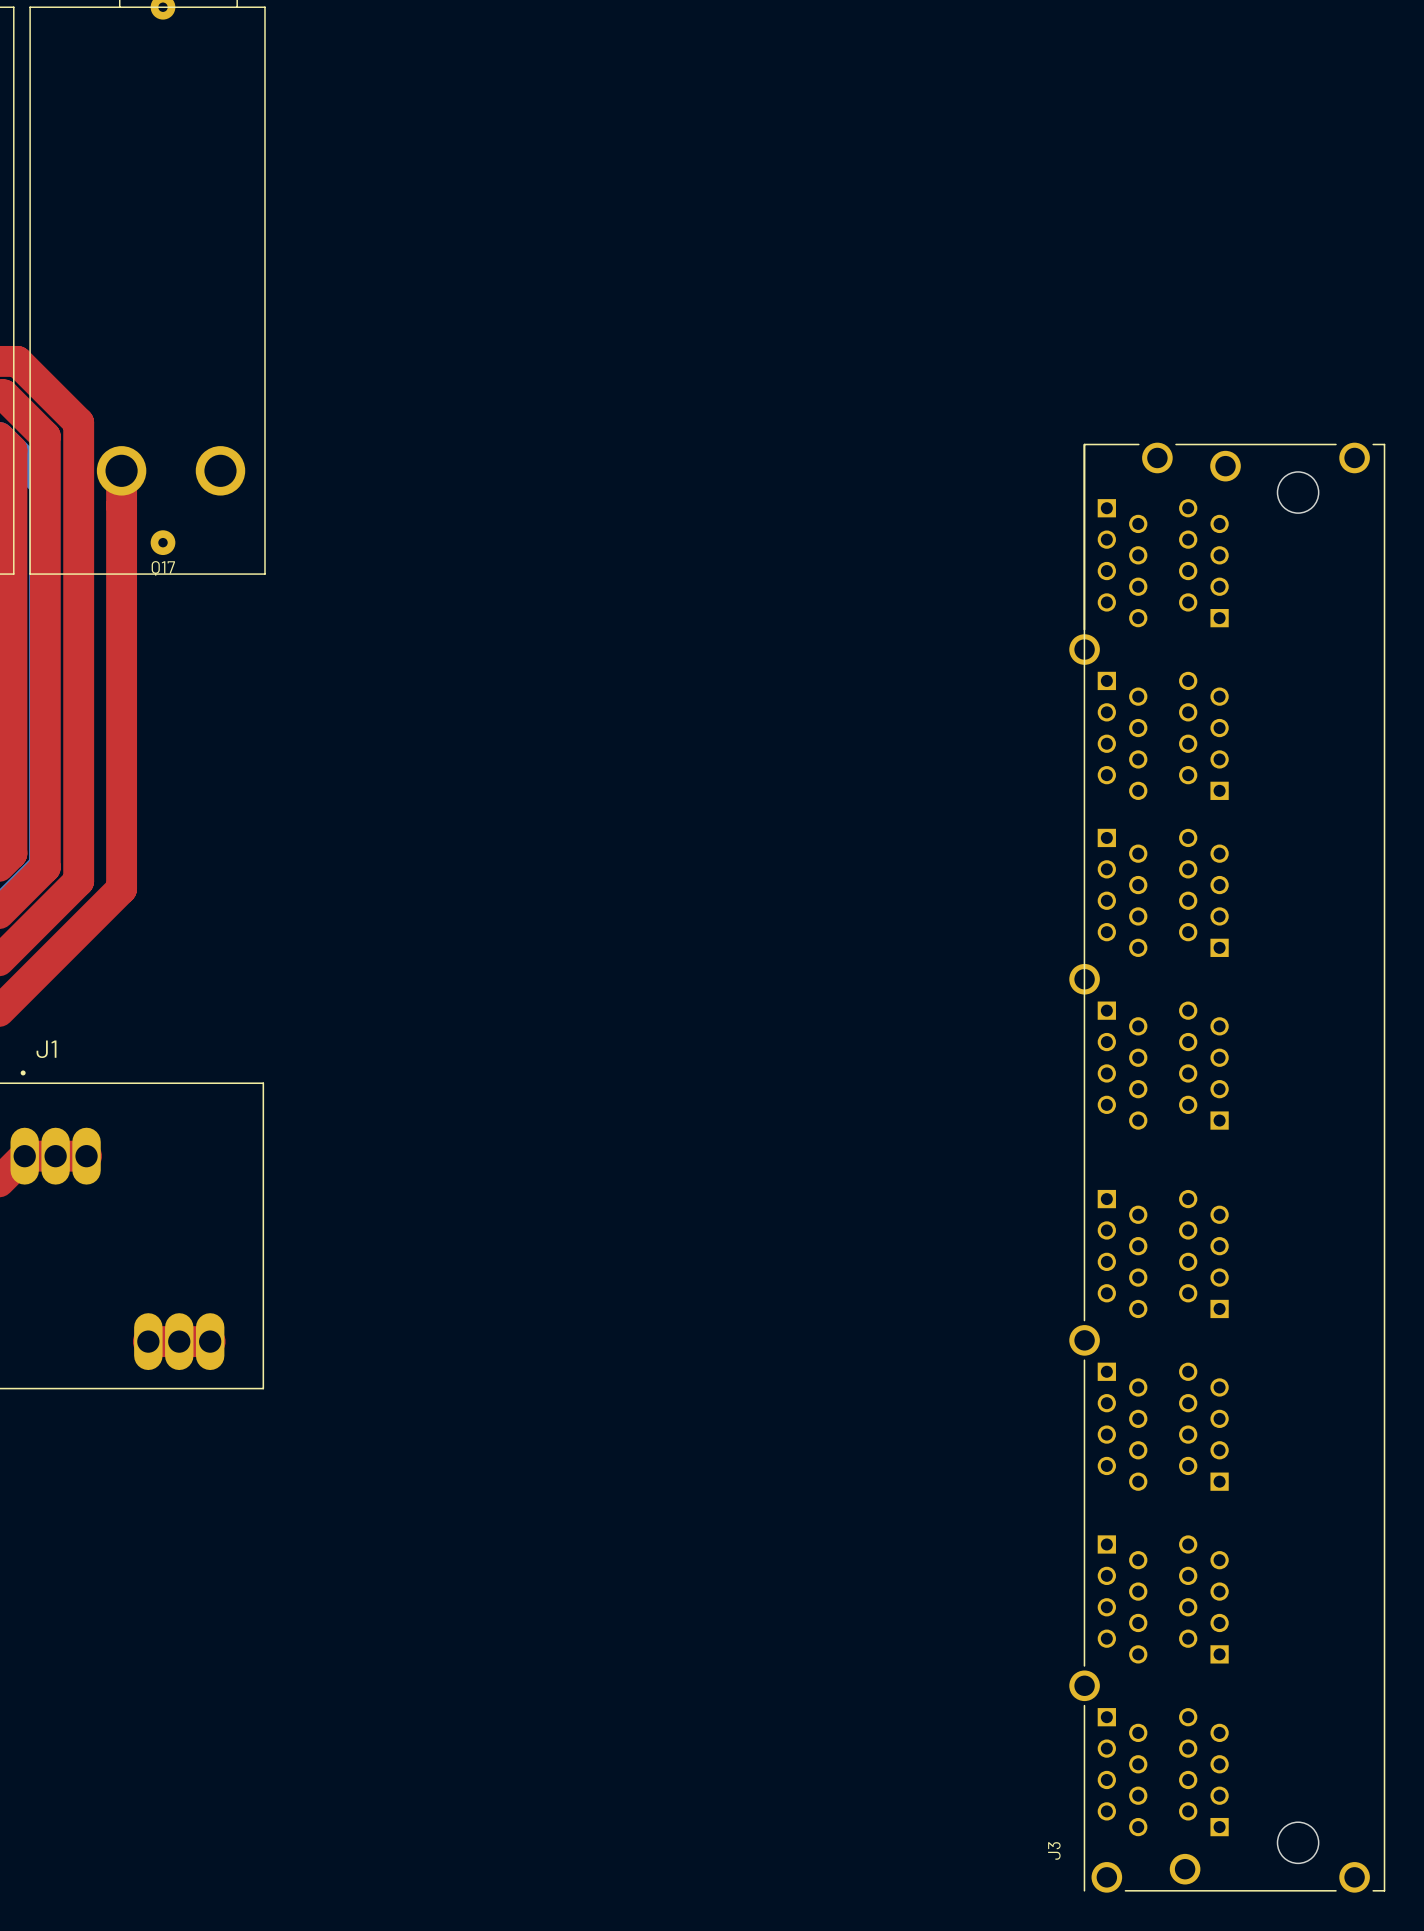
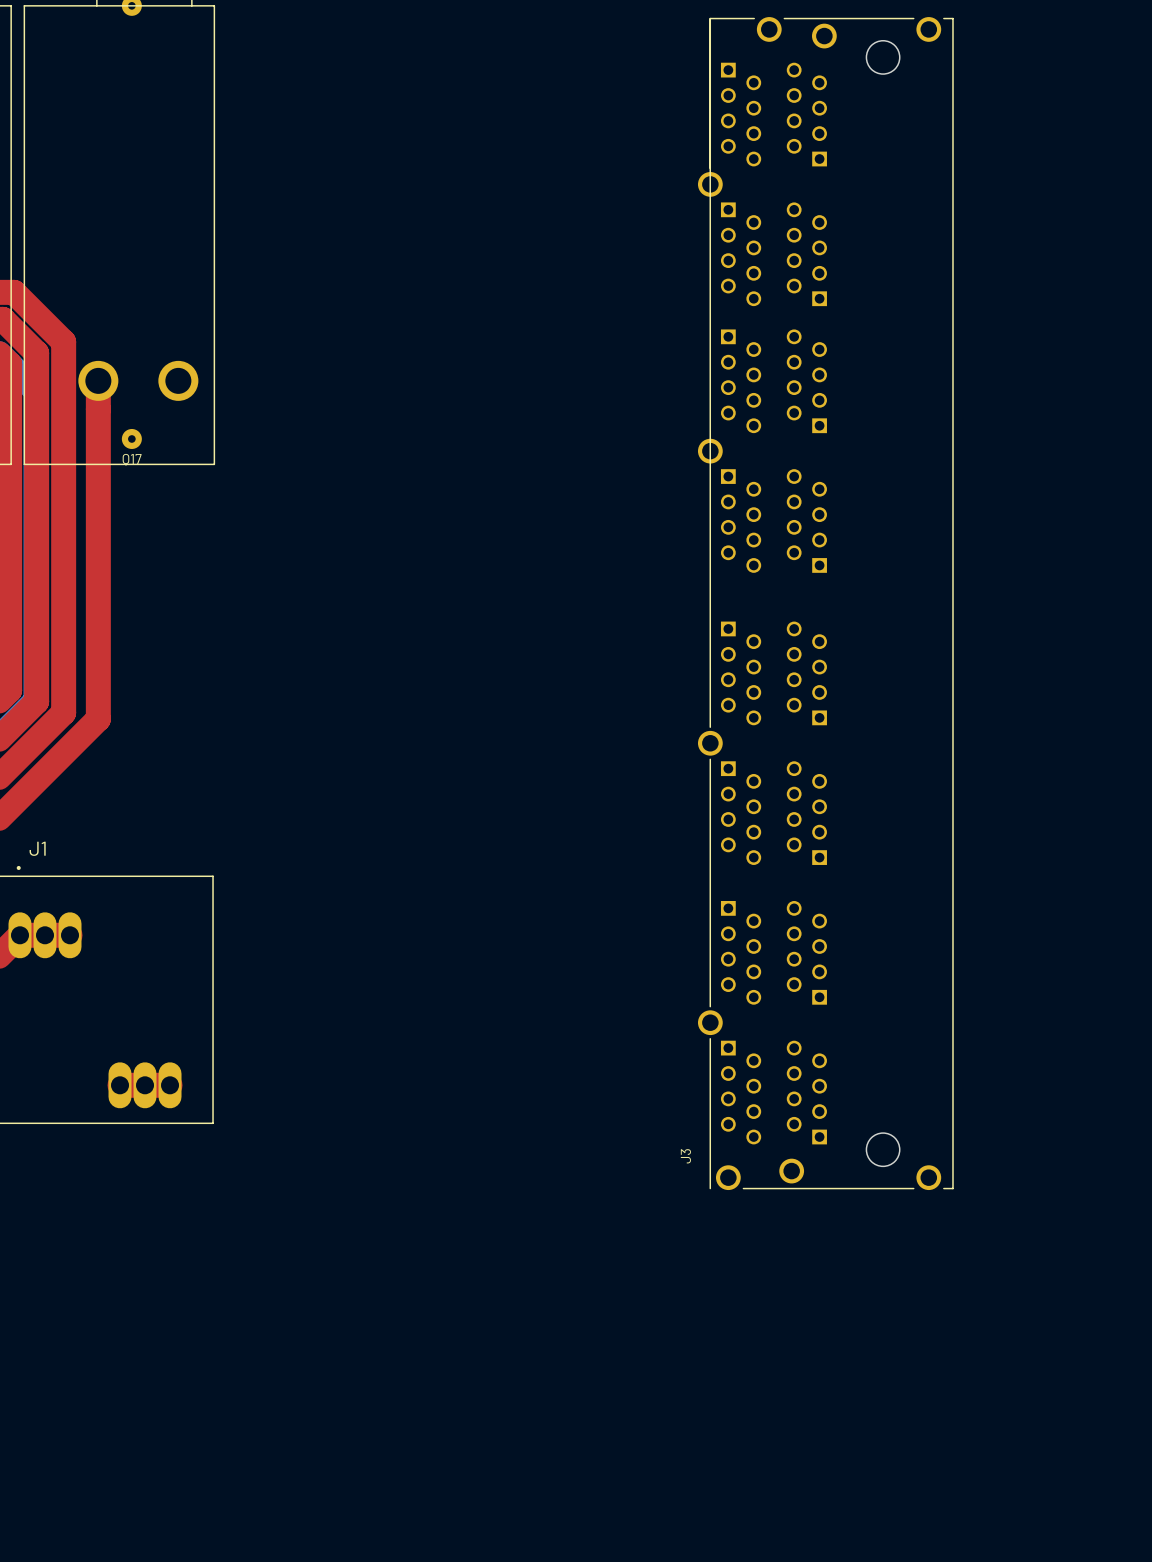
J3 position: (1227, 1167) -> (825, 603)

